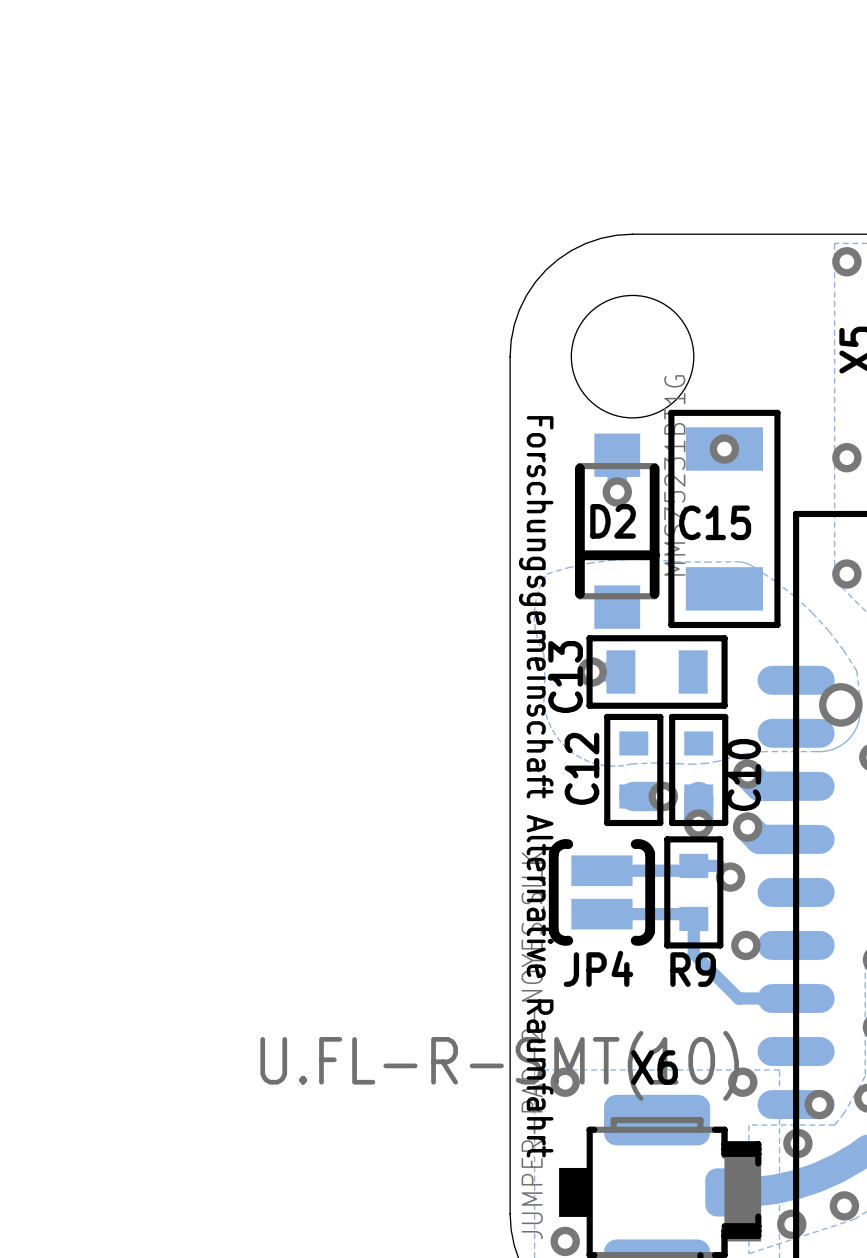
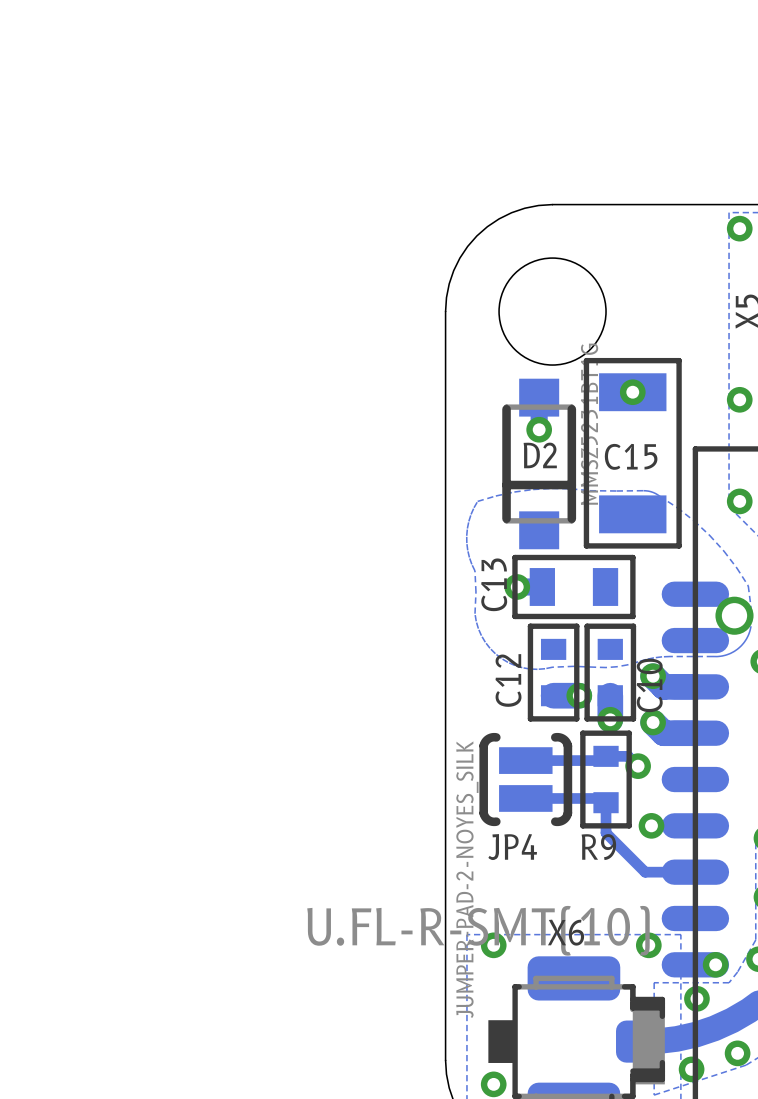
text: Forschungsgemeinschaft Alternative Raumfahrt (536, 786) -> none

